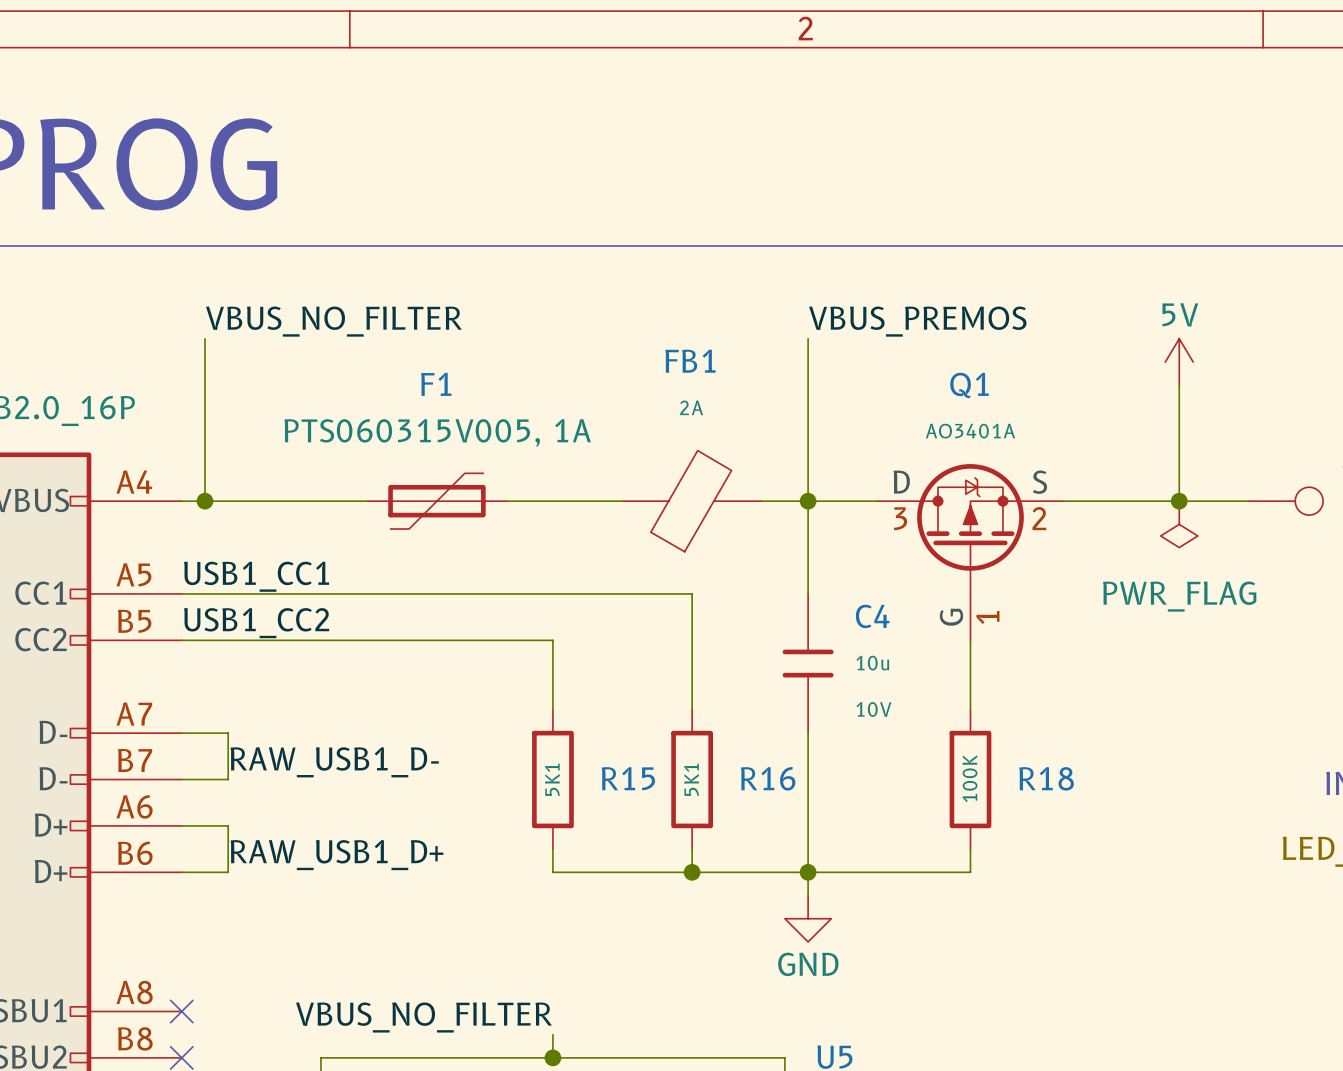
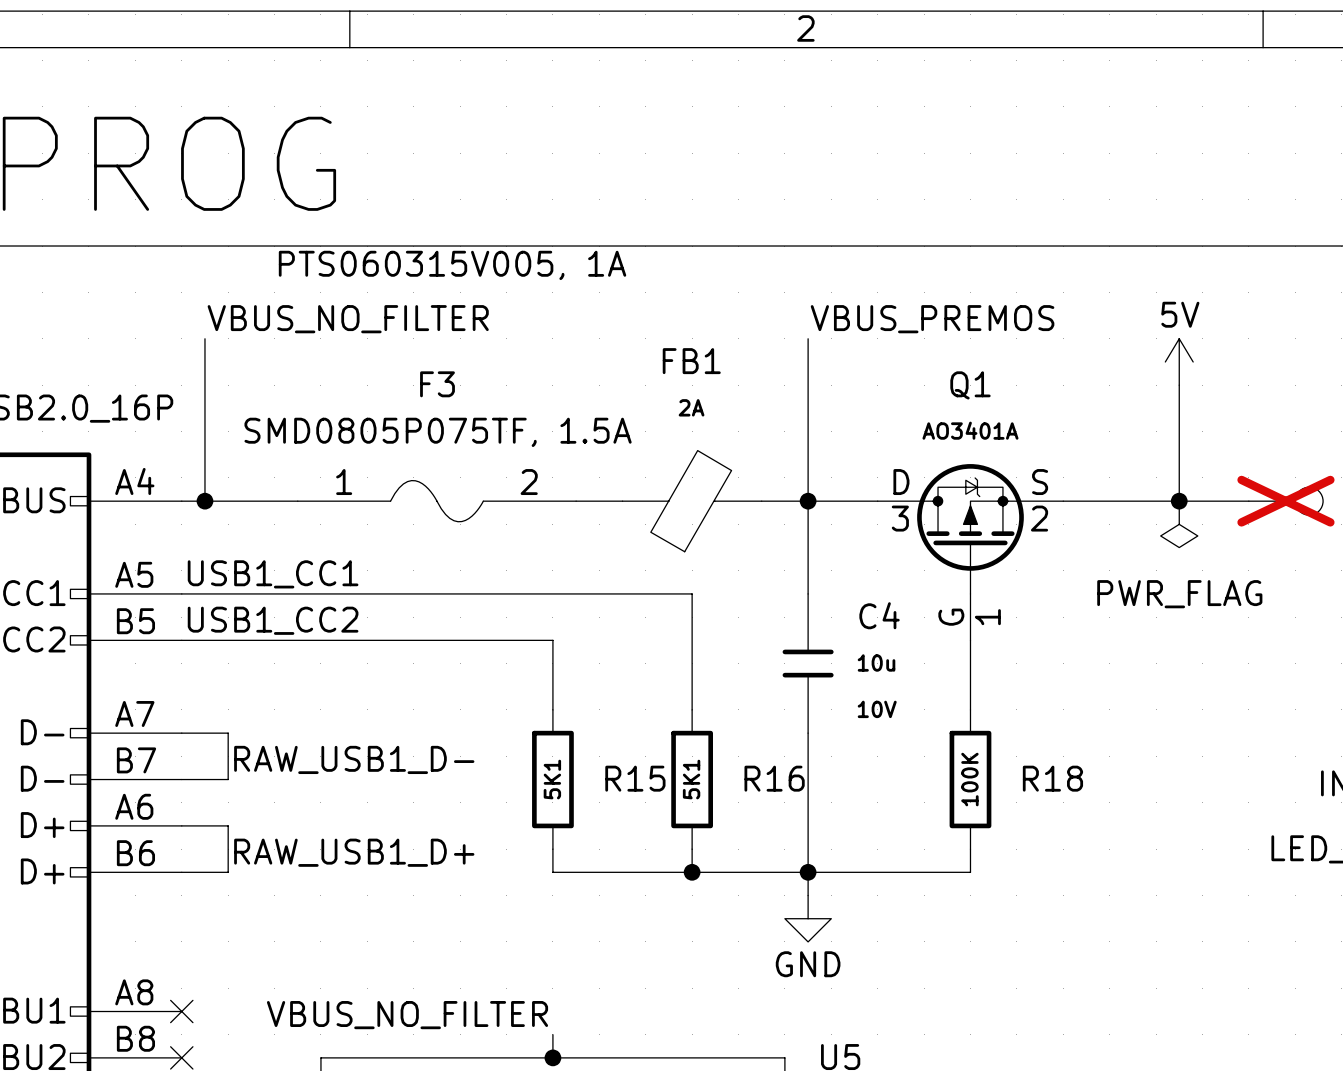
text: none -> PTS060315V005, 1A (452, 265)
F1: PTS060315V005, 1A (436, 501) -> none
F3: none -> SMD0805P075TF, 1.5A (436, 501)
part do-not-place cross: none -> (1285, 501)

